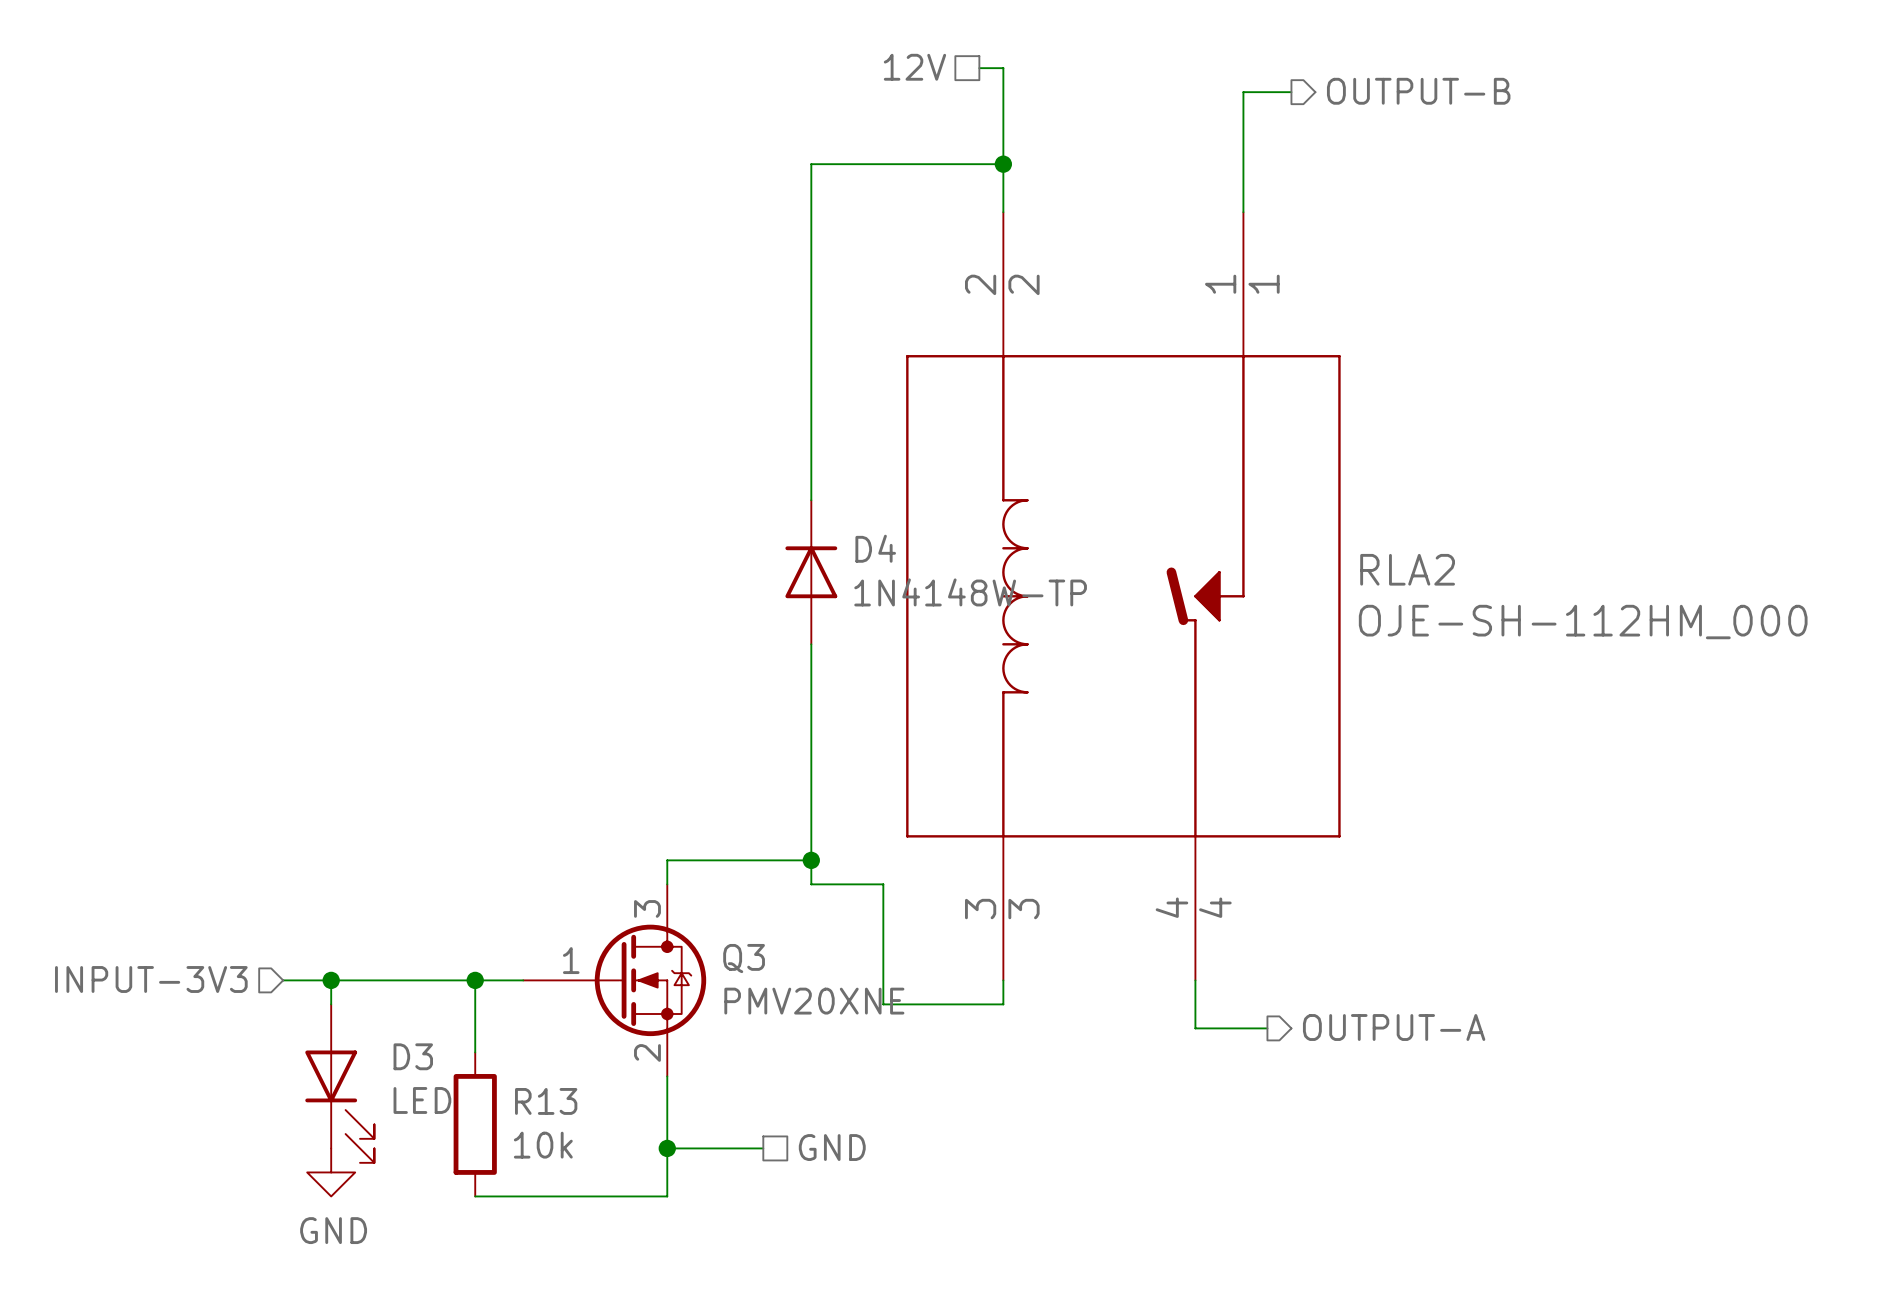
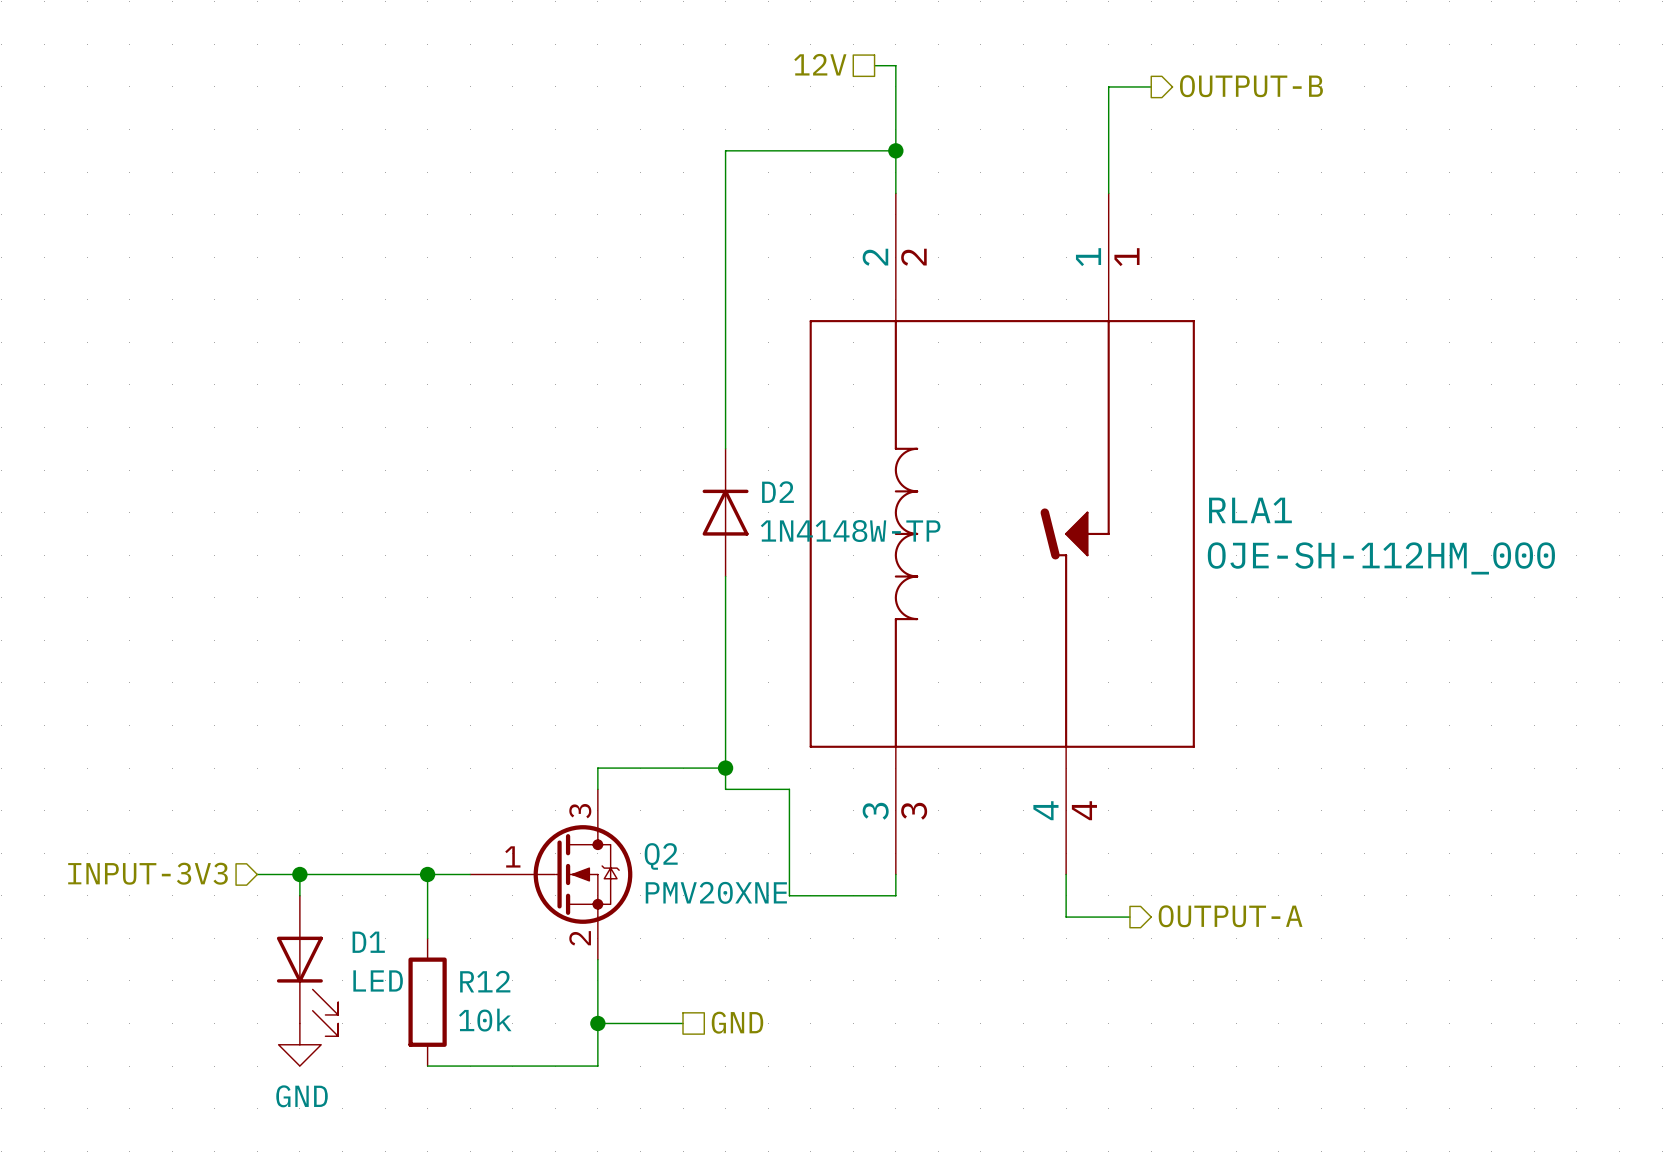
D4 name: D4 (875, 548) -> D2 (777, 492)
RLA2 name: RLA2 (1407, 569) -> RLA1 (1250, 510)
Q3 name: Q3 (744, 958) -> Q2 (661, 856)
D3 name: D3 (413, 1056) -> D1 (368, 942)
R13 name: R13 (546, 1101) -> R12 (485, 981)

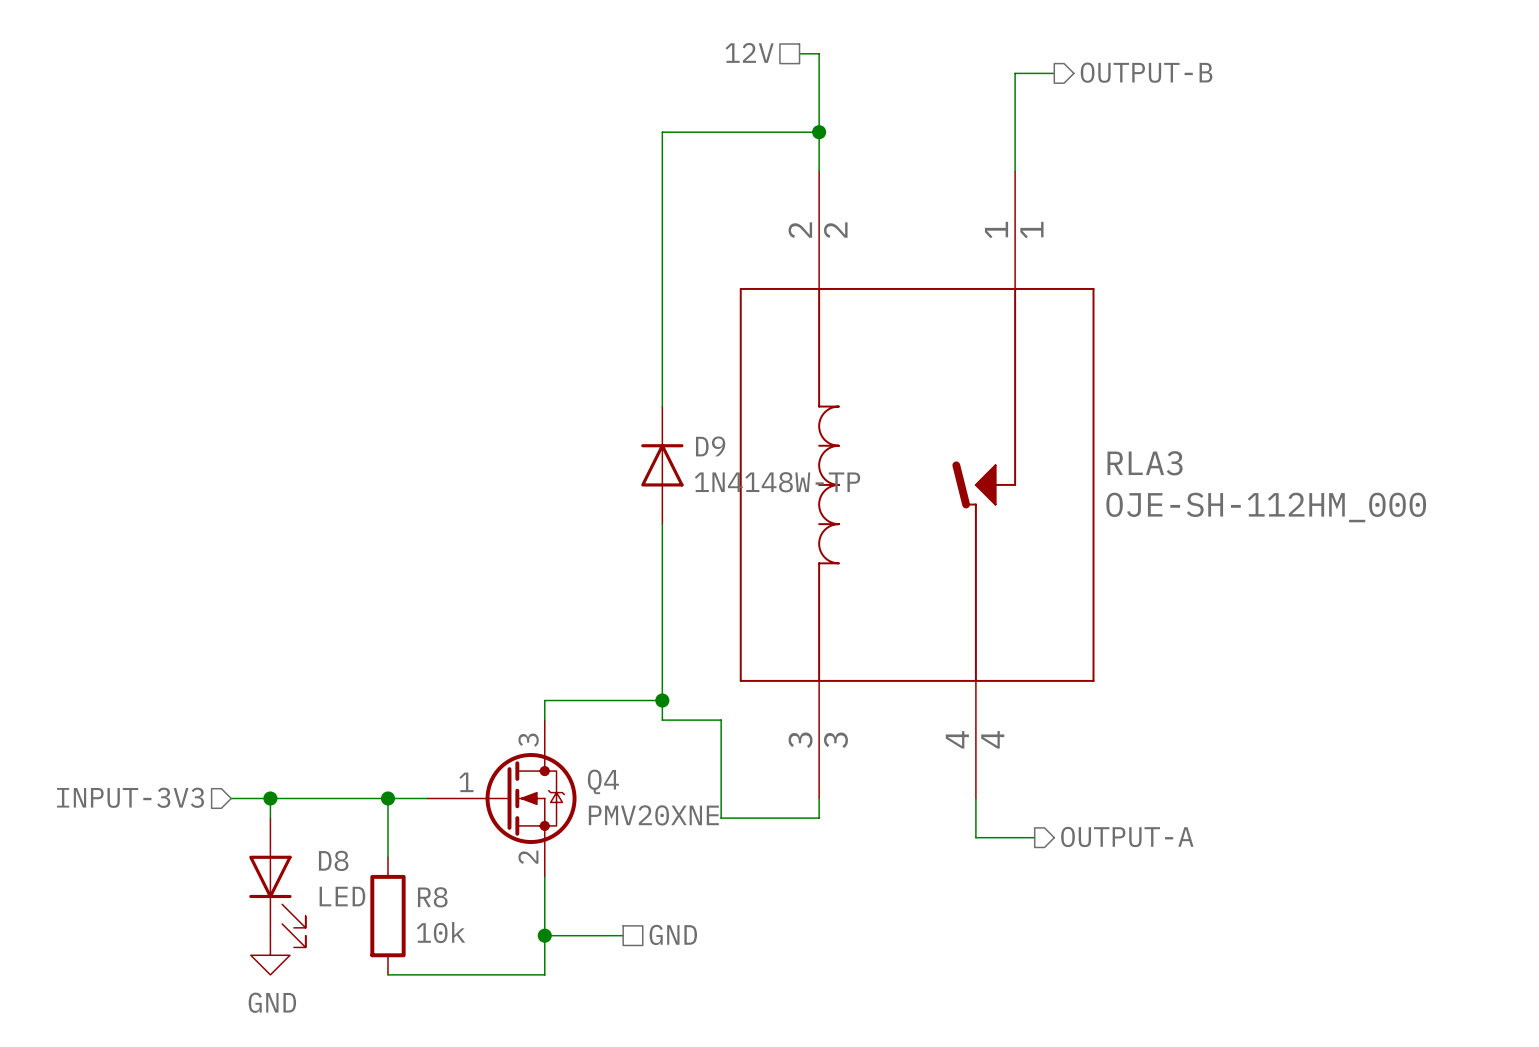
D2 name: D2 (777, 492) -> D9 (710, 446)
RLA1 name: RLA1 (1250, 510) -> RLA3 (1145, 463)
Q2 name: Q2 (661, 856) -> Q4 (603, 781)
D1 name: D1 (368, 942) -> D8 (333, 860)
R12 name: R12 (485, 981) -> R8 (432, 897)

